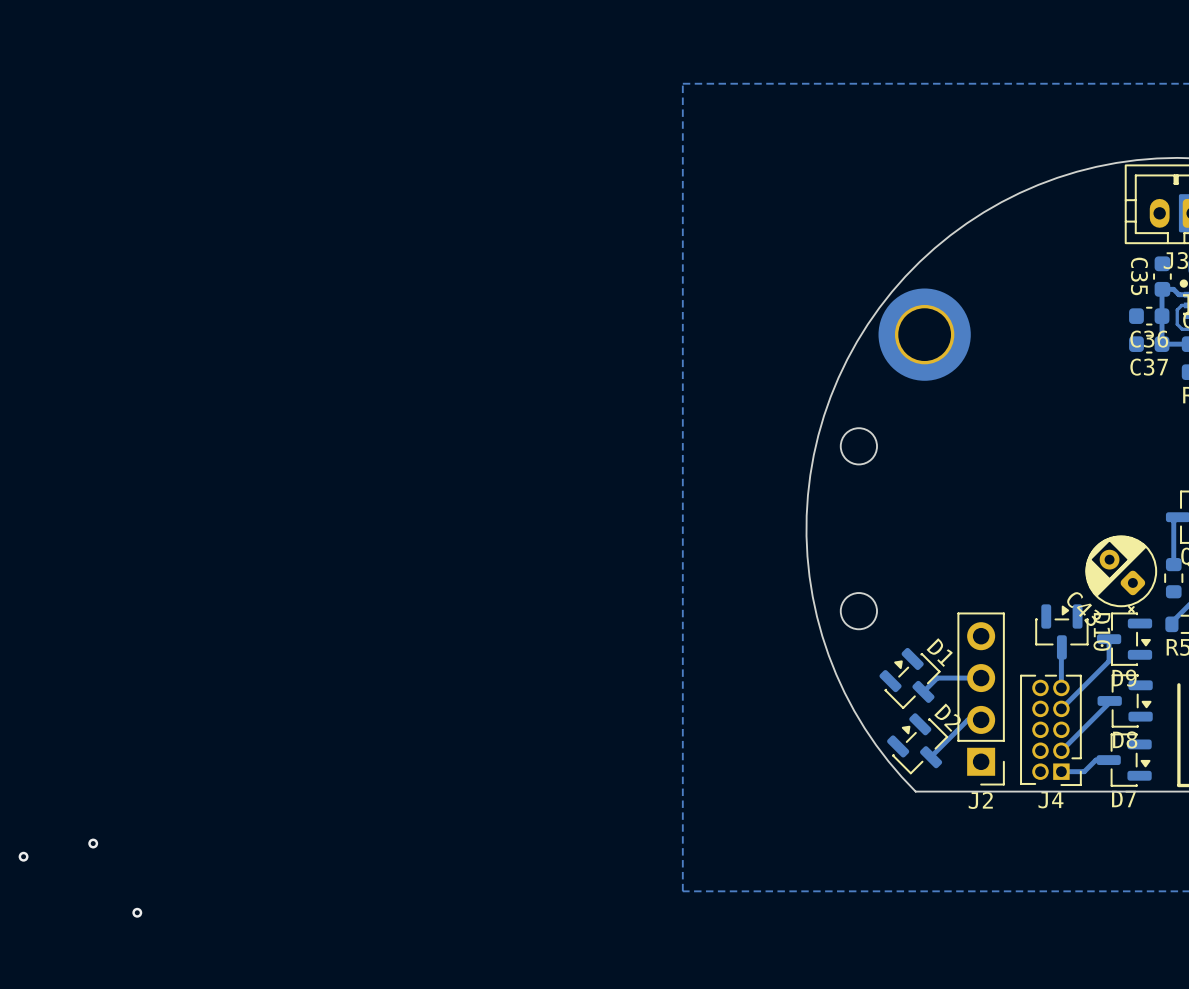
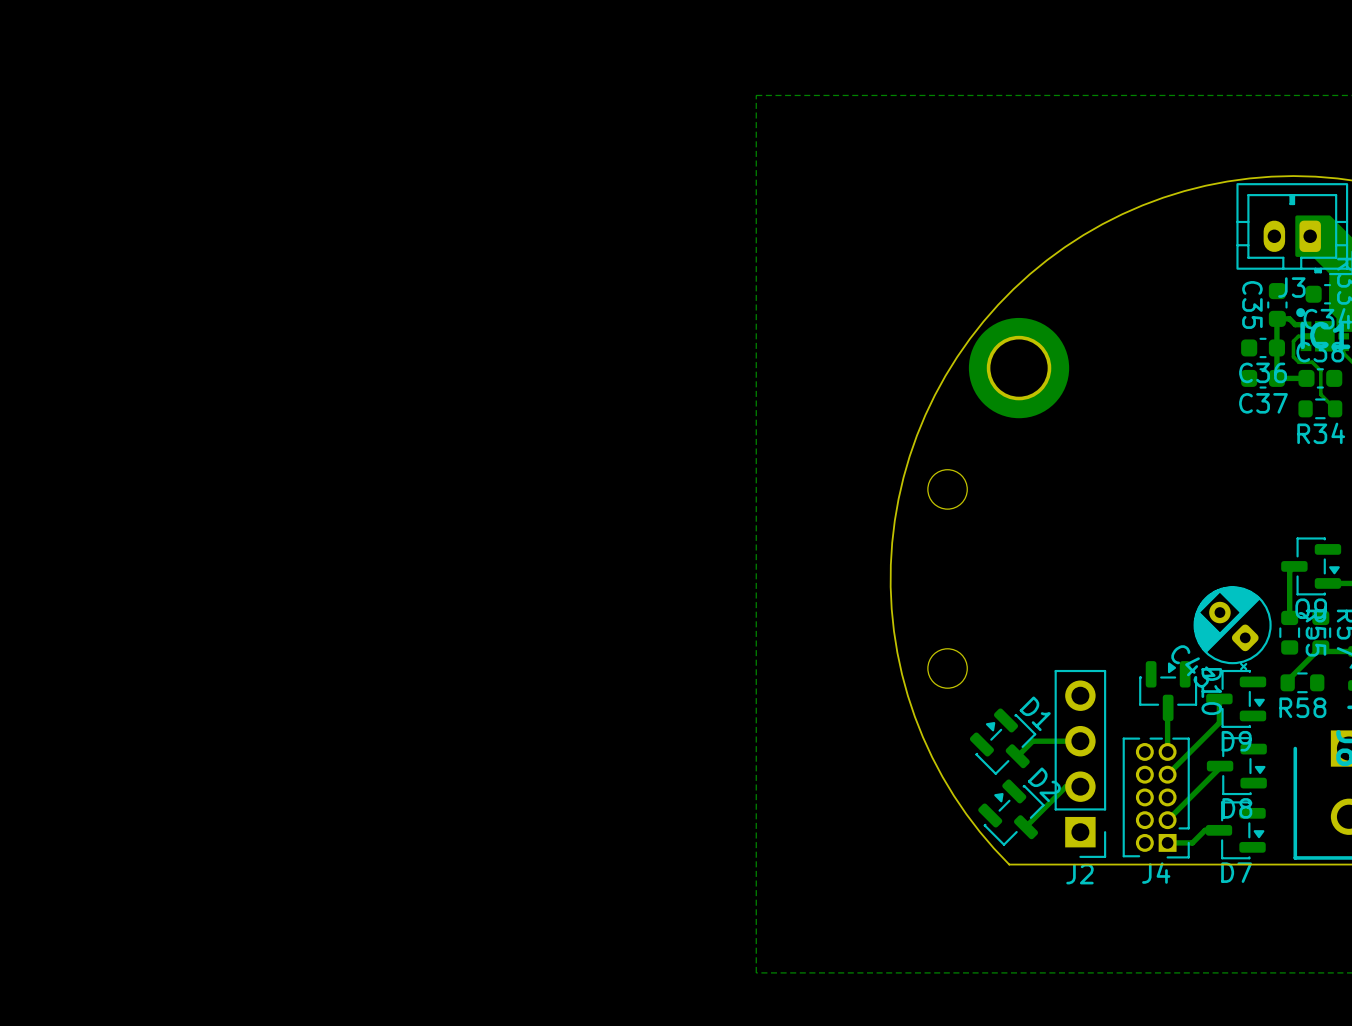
via: (93, 843) -> none
via: (23, 856) -> none
via: (137, 912) -> none

